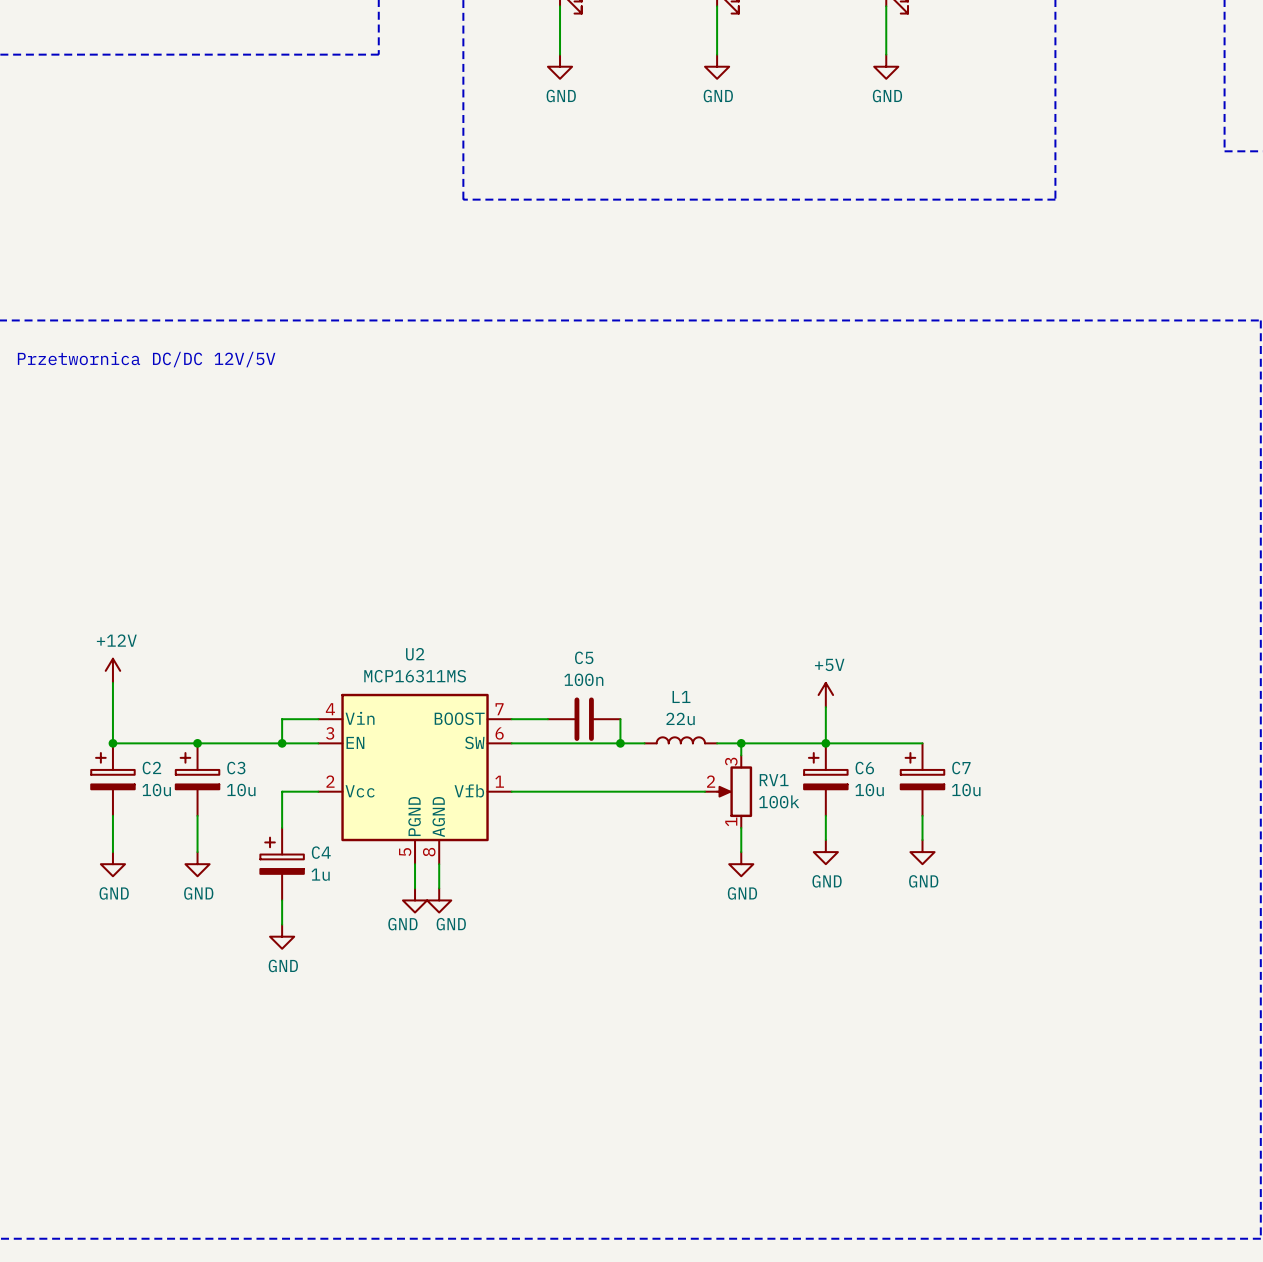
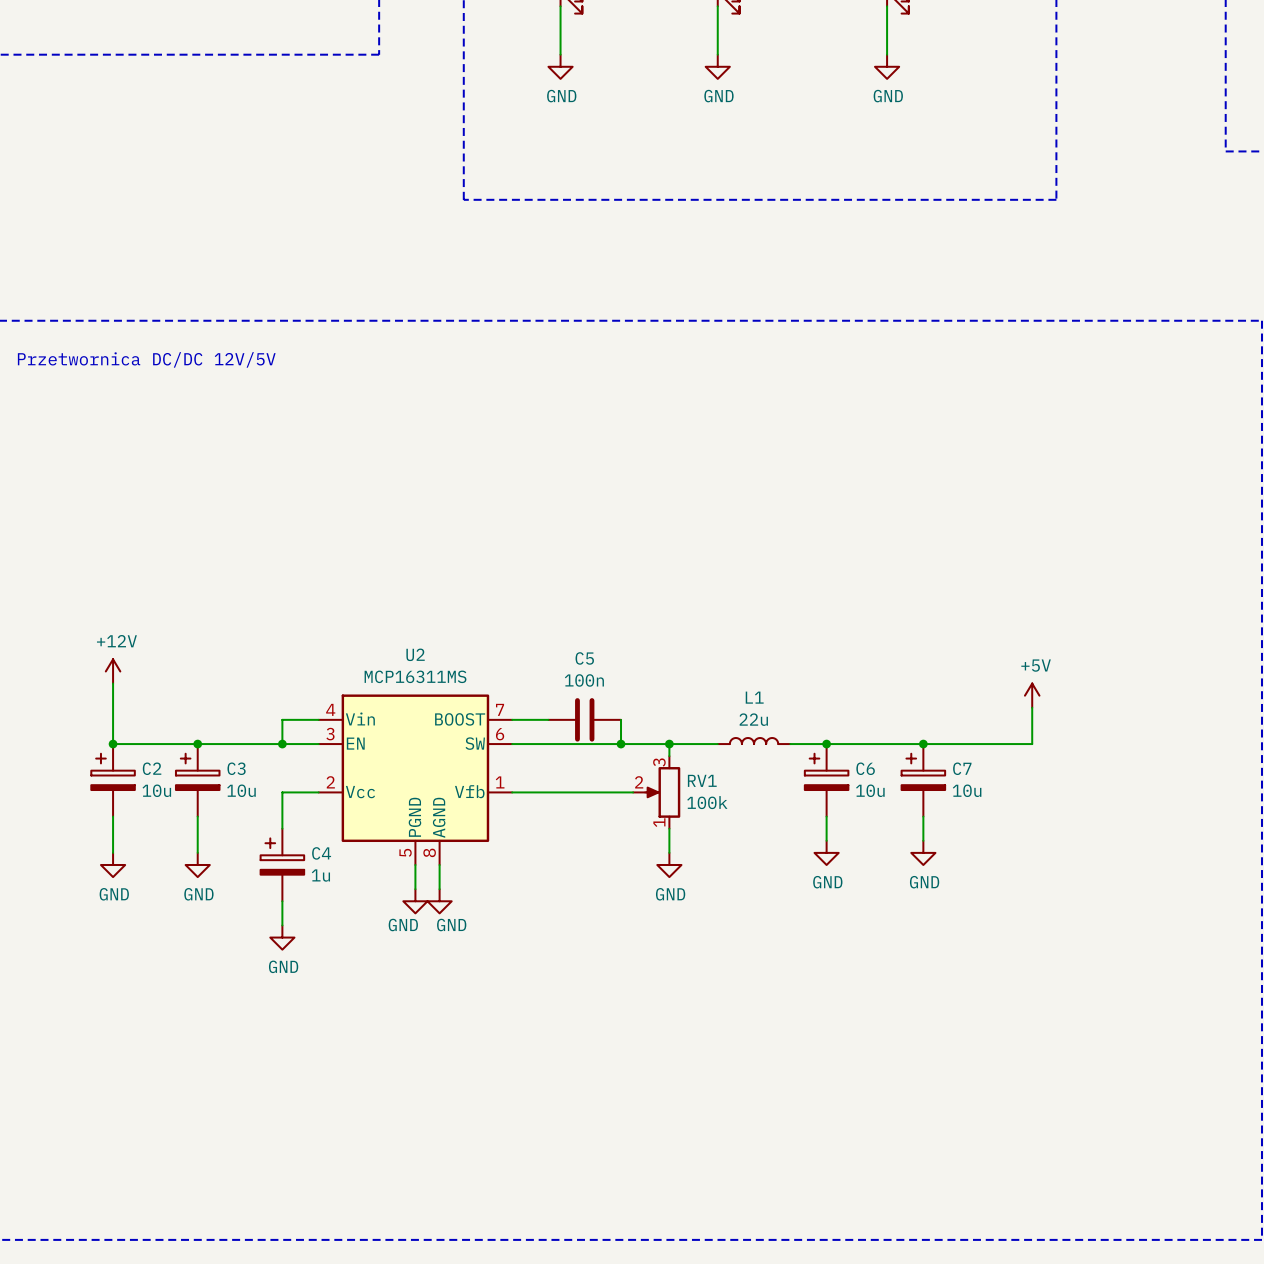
power symbol position: +5V (825, 695) -> +5V (1032, 695)
wire: (825, 707) (825, 743) -> none
wire: none -> (1032, 707) (1032, 744) (923, 744)
L1 position: (680, 740) -> (754, 741)
junction: none -> (669, 744)
wire: (717, 743) (789, 743) -> (717, 744) (645, 744)
wire: (741, 743) (741, 755) -> (669, 744) (669, 756)
junction: (741, 743) -> none
junction: none -> (923, 744)
wire: (632, 791) (705, 791) -> none
RV1 position: (728, 791) -> (656, 792)
wire: (741, 827) (741, 852) -> (669, 828) (669, 852)
power symbol position: GND (741, 864) -> GND (669, 864)

